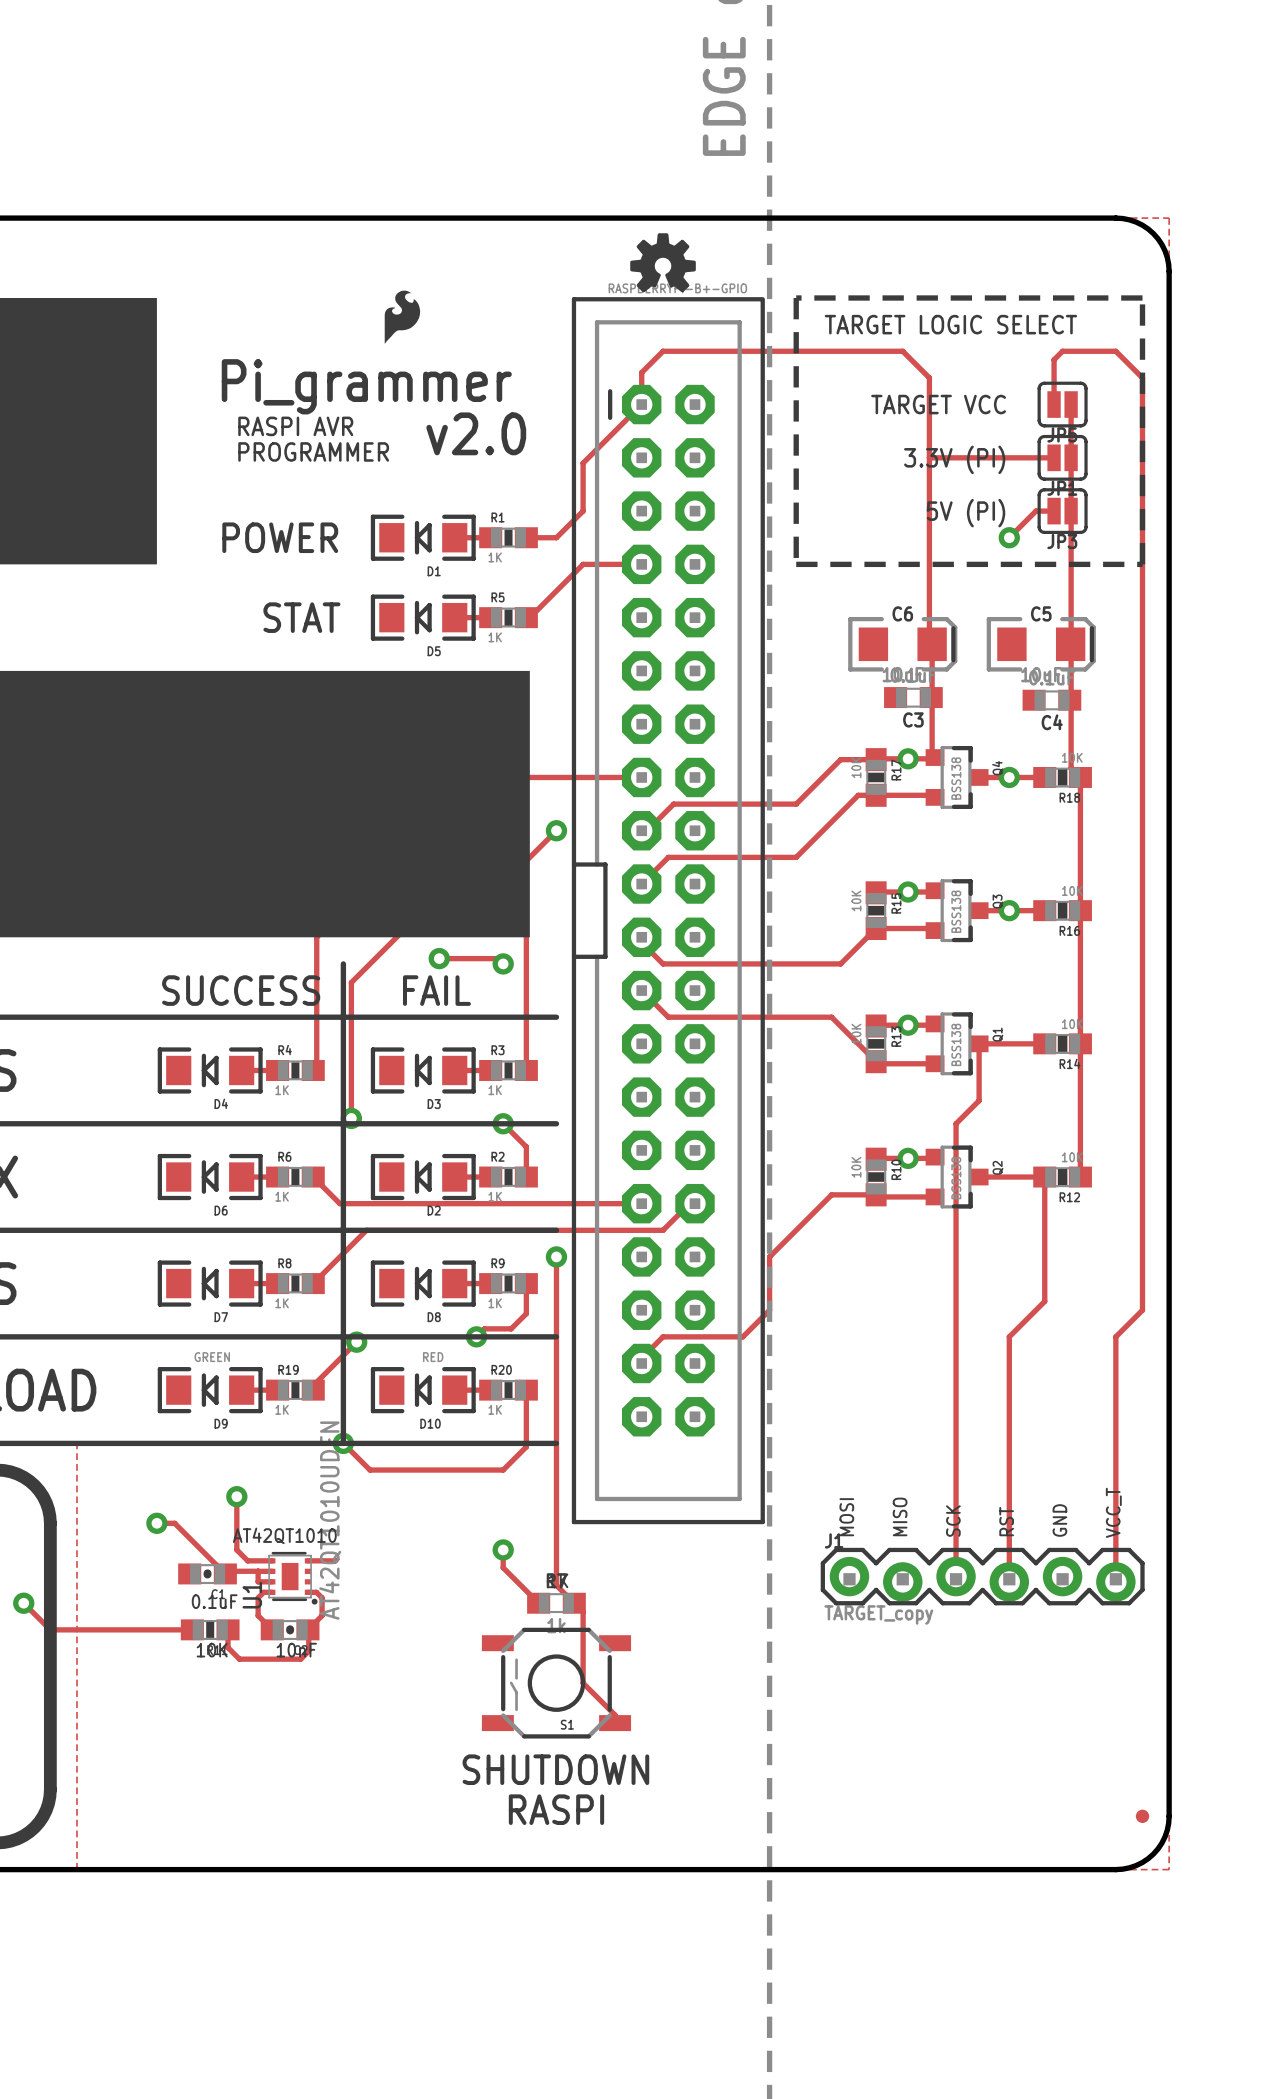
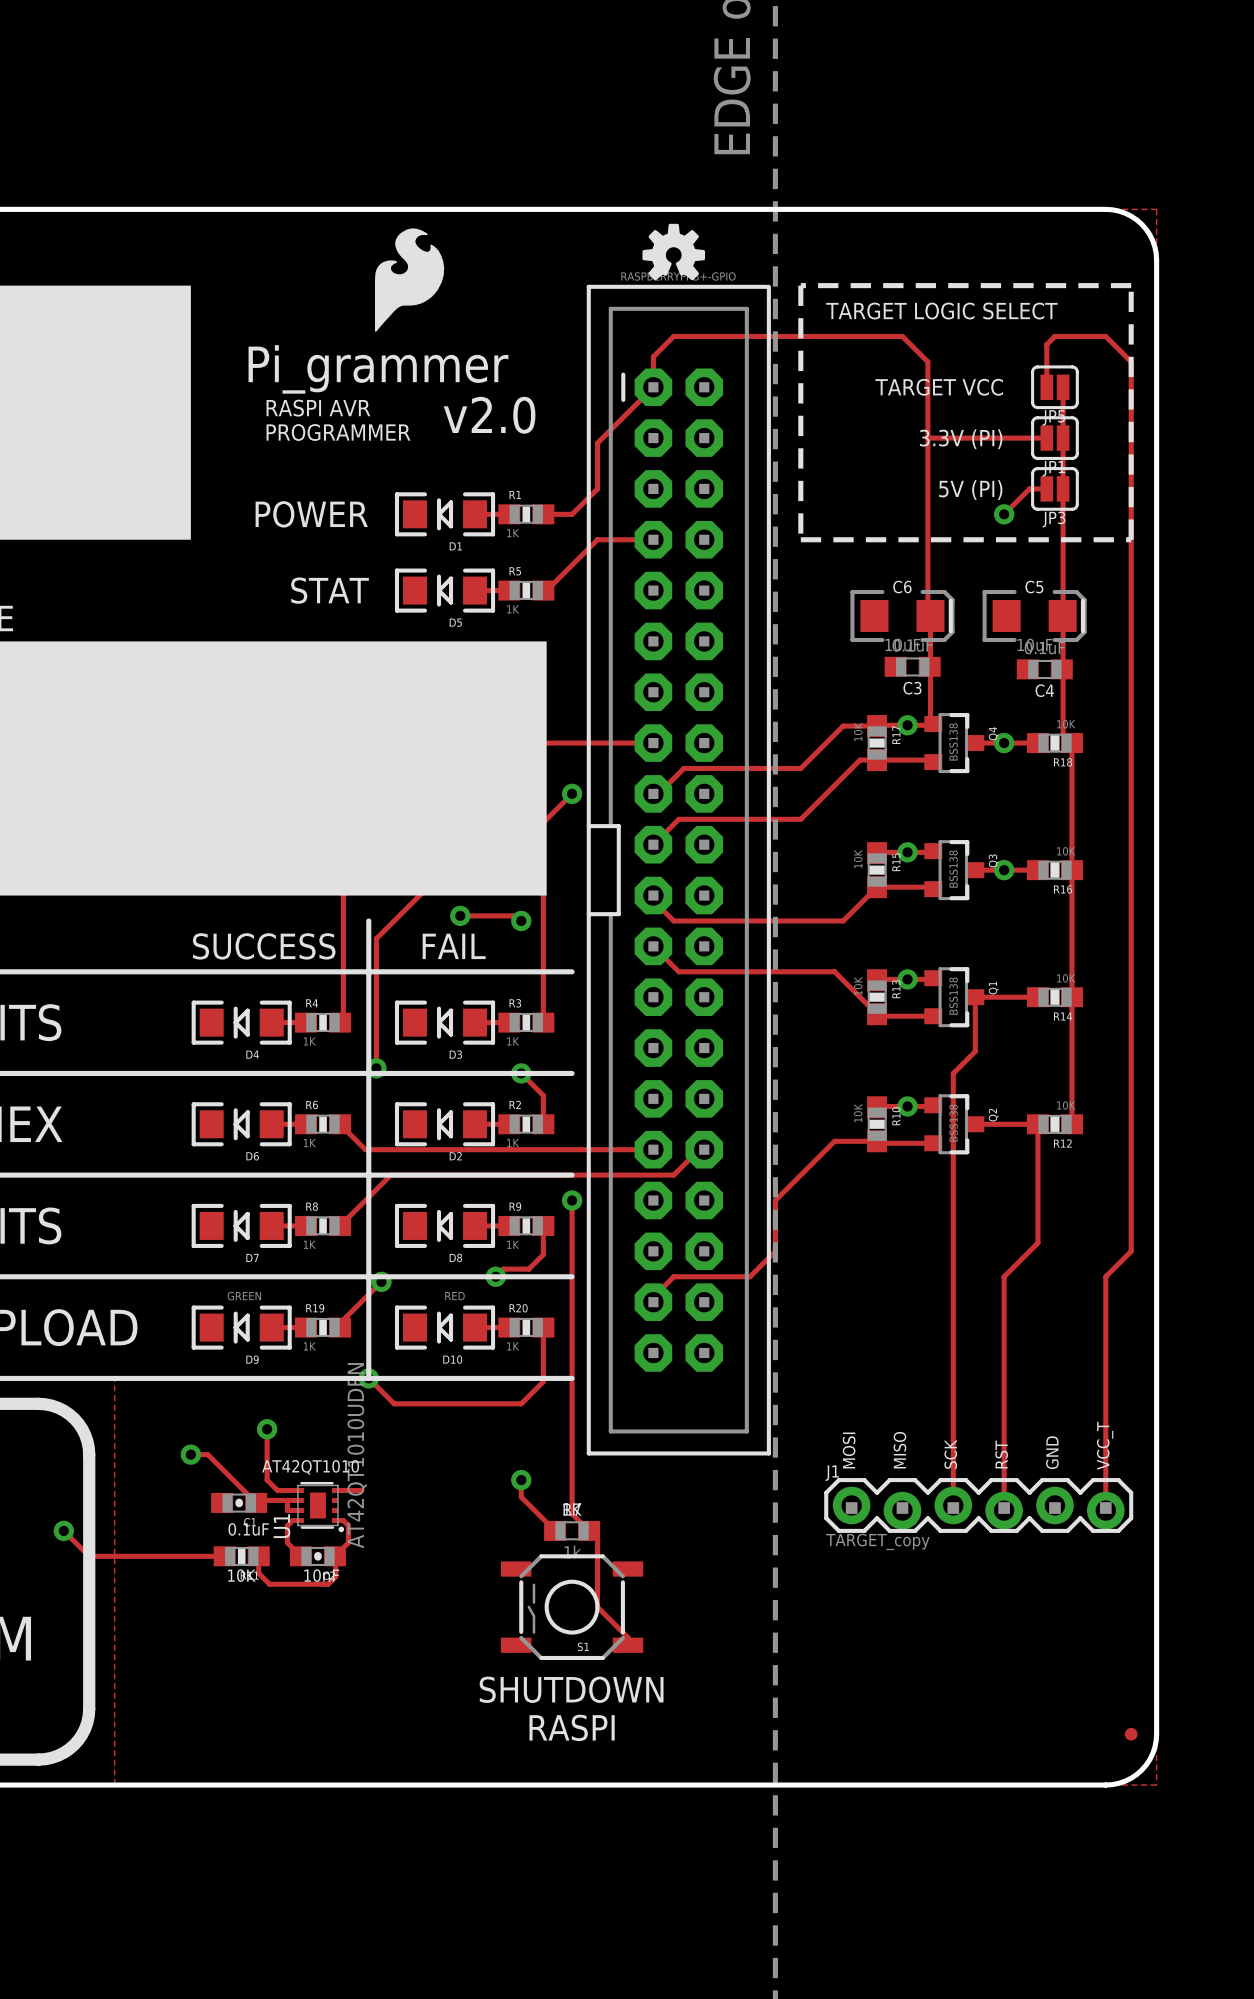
drawing: none -> [375, 228, 445, 332]
drawing: [384, 290, 421, 344] -> none

